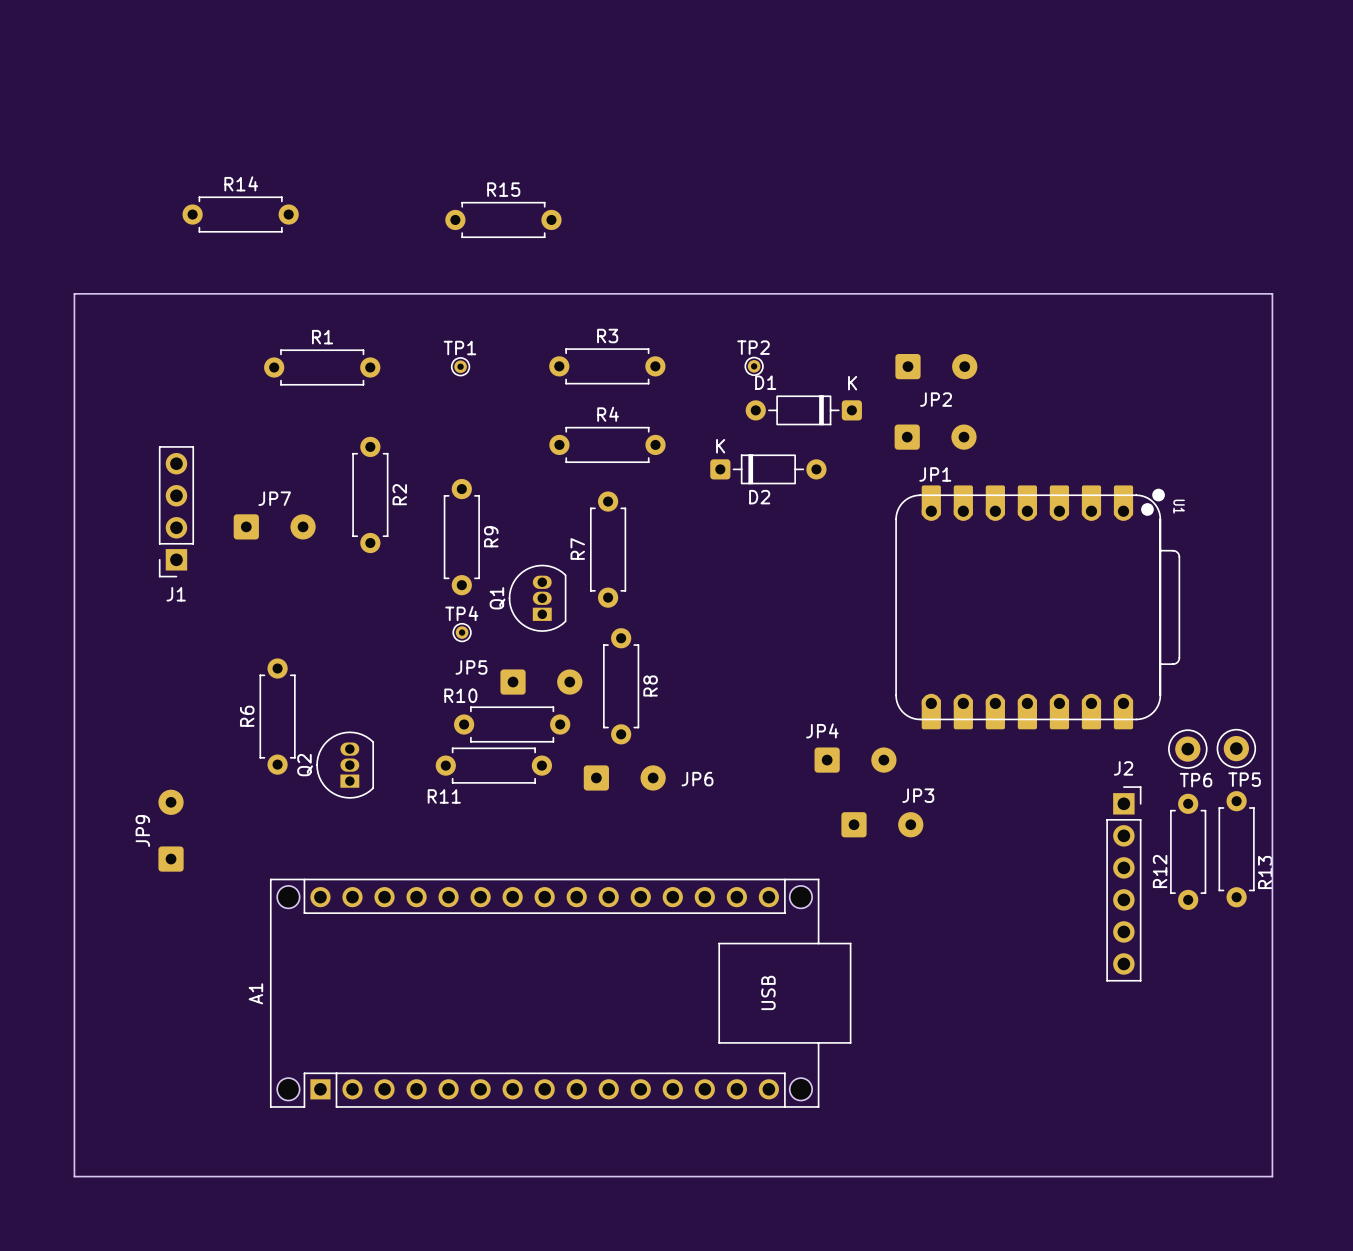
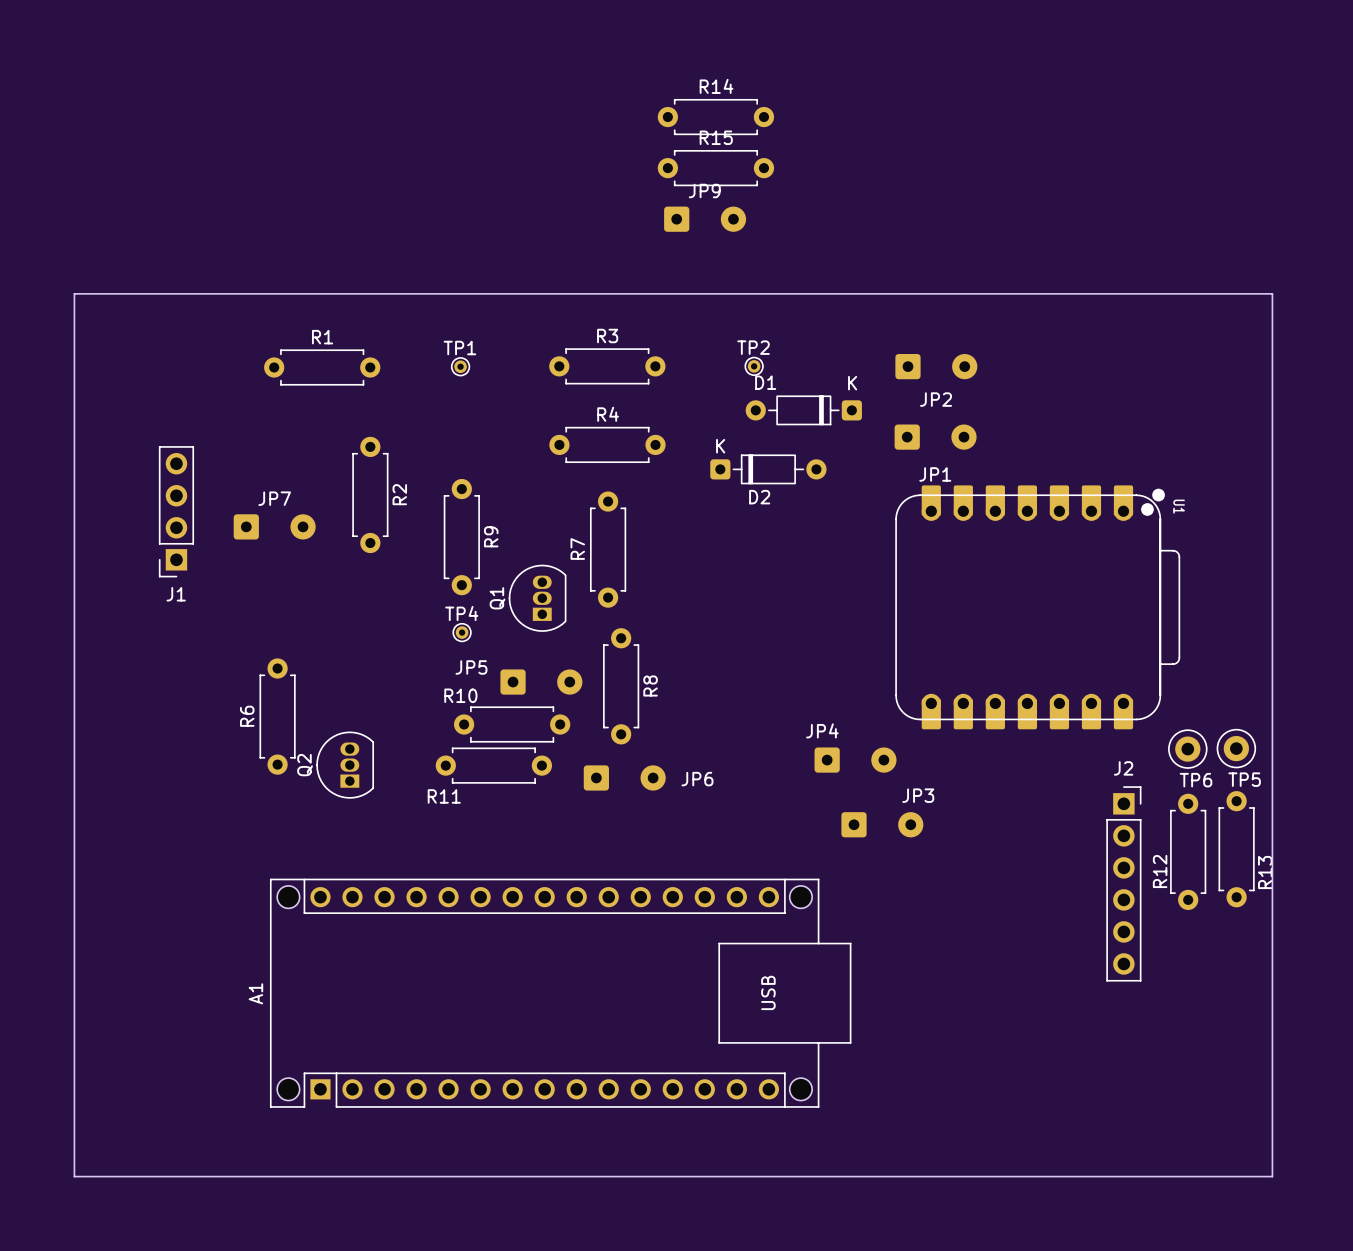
R14 position: (240, 214) -> (715, 117)
R15 position: (503, 219) -> (715, 168)
JP9 rotation: 0° (171, 830) -> 90° clockwise (705, 219)
JP9 position: (171, 830) -> (705, 219)

